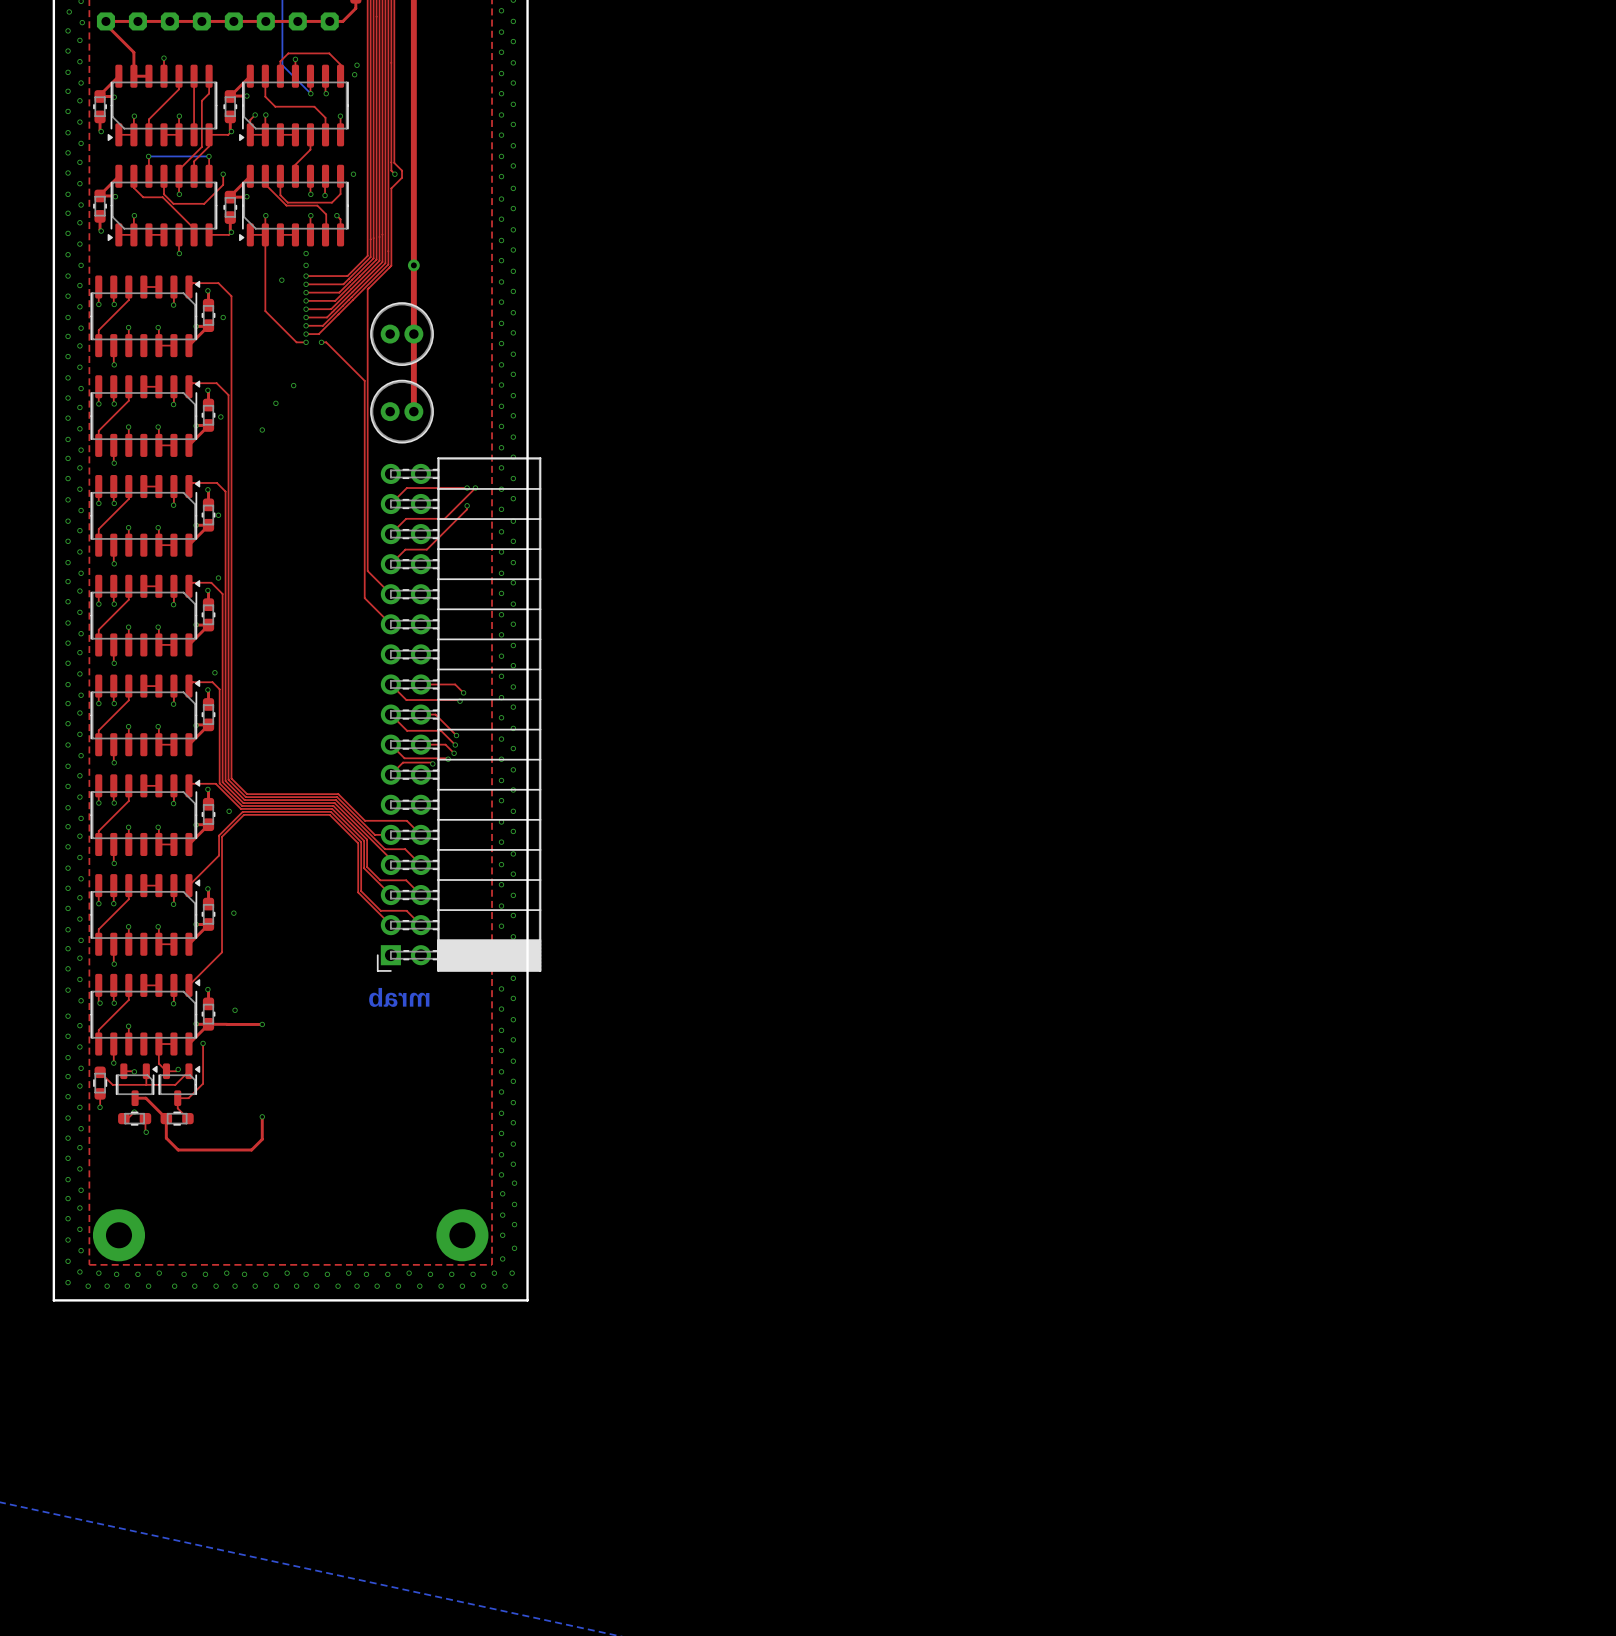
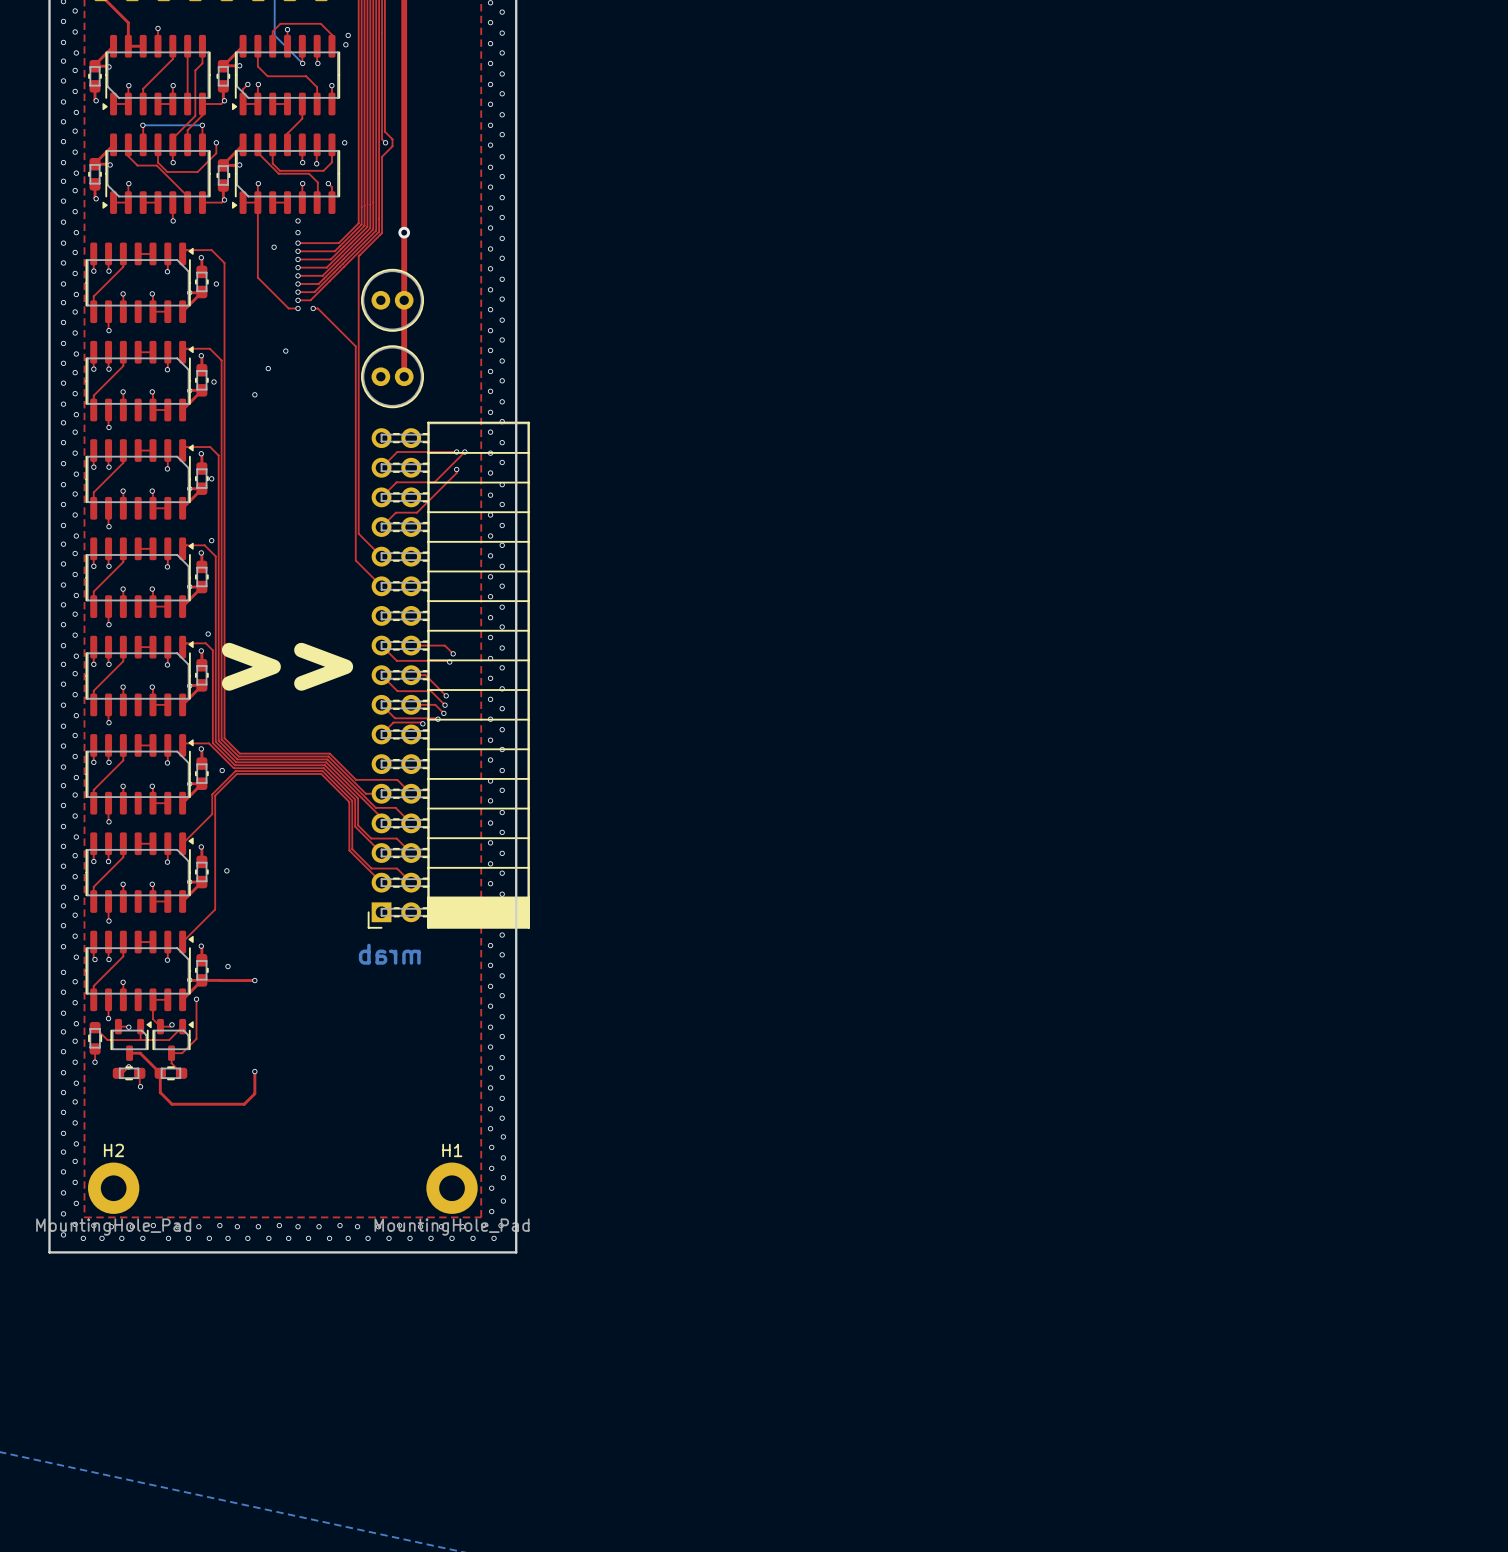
text: none -> >> (287, 666)
H2 name: none -> H2 (113, 1150)
H1 name: none -> H1 (452, 1150)
H2 value: none -> MountingHole_Pad (113, 1227)
H1 value: none -> MountingHole_Pad (452, 1227)

